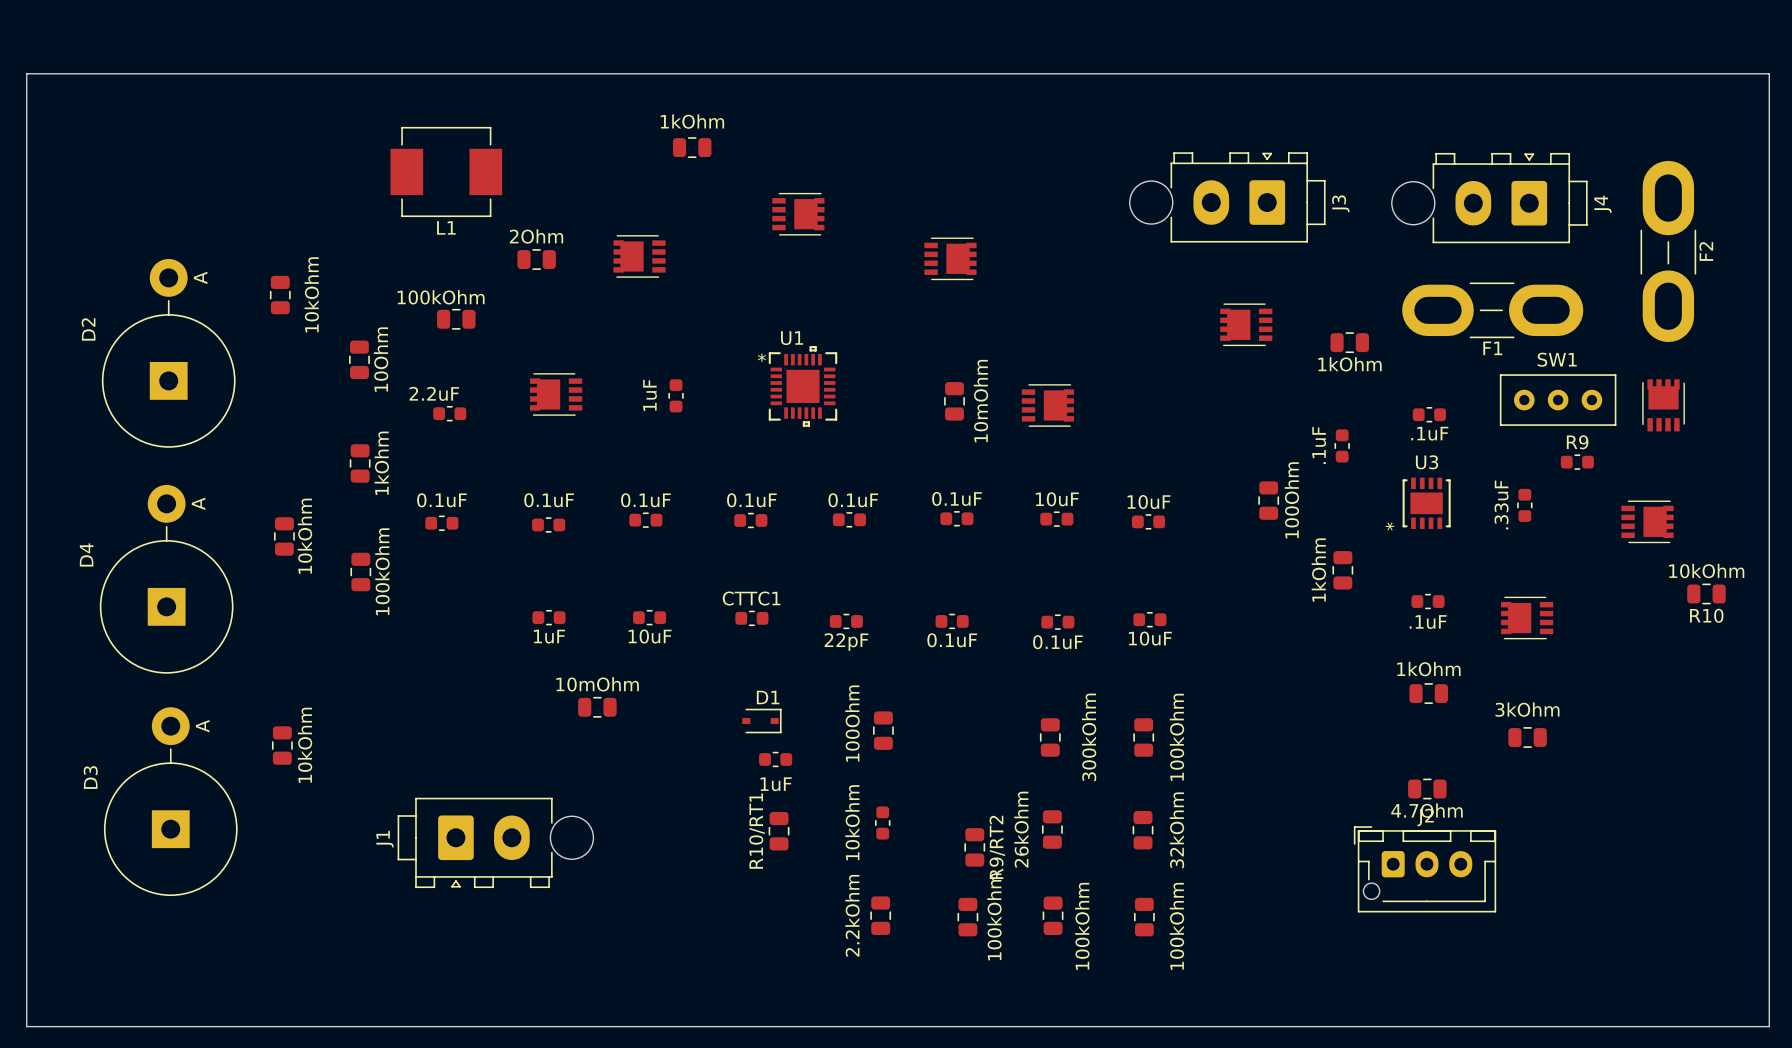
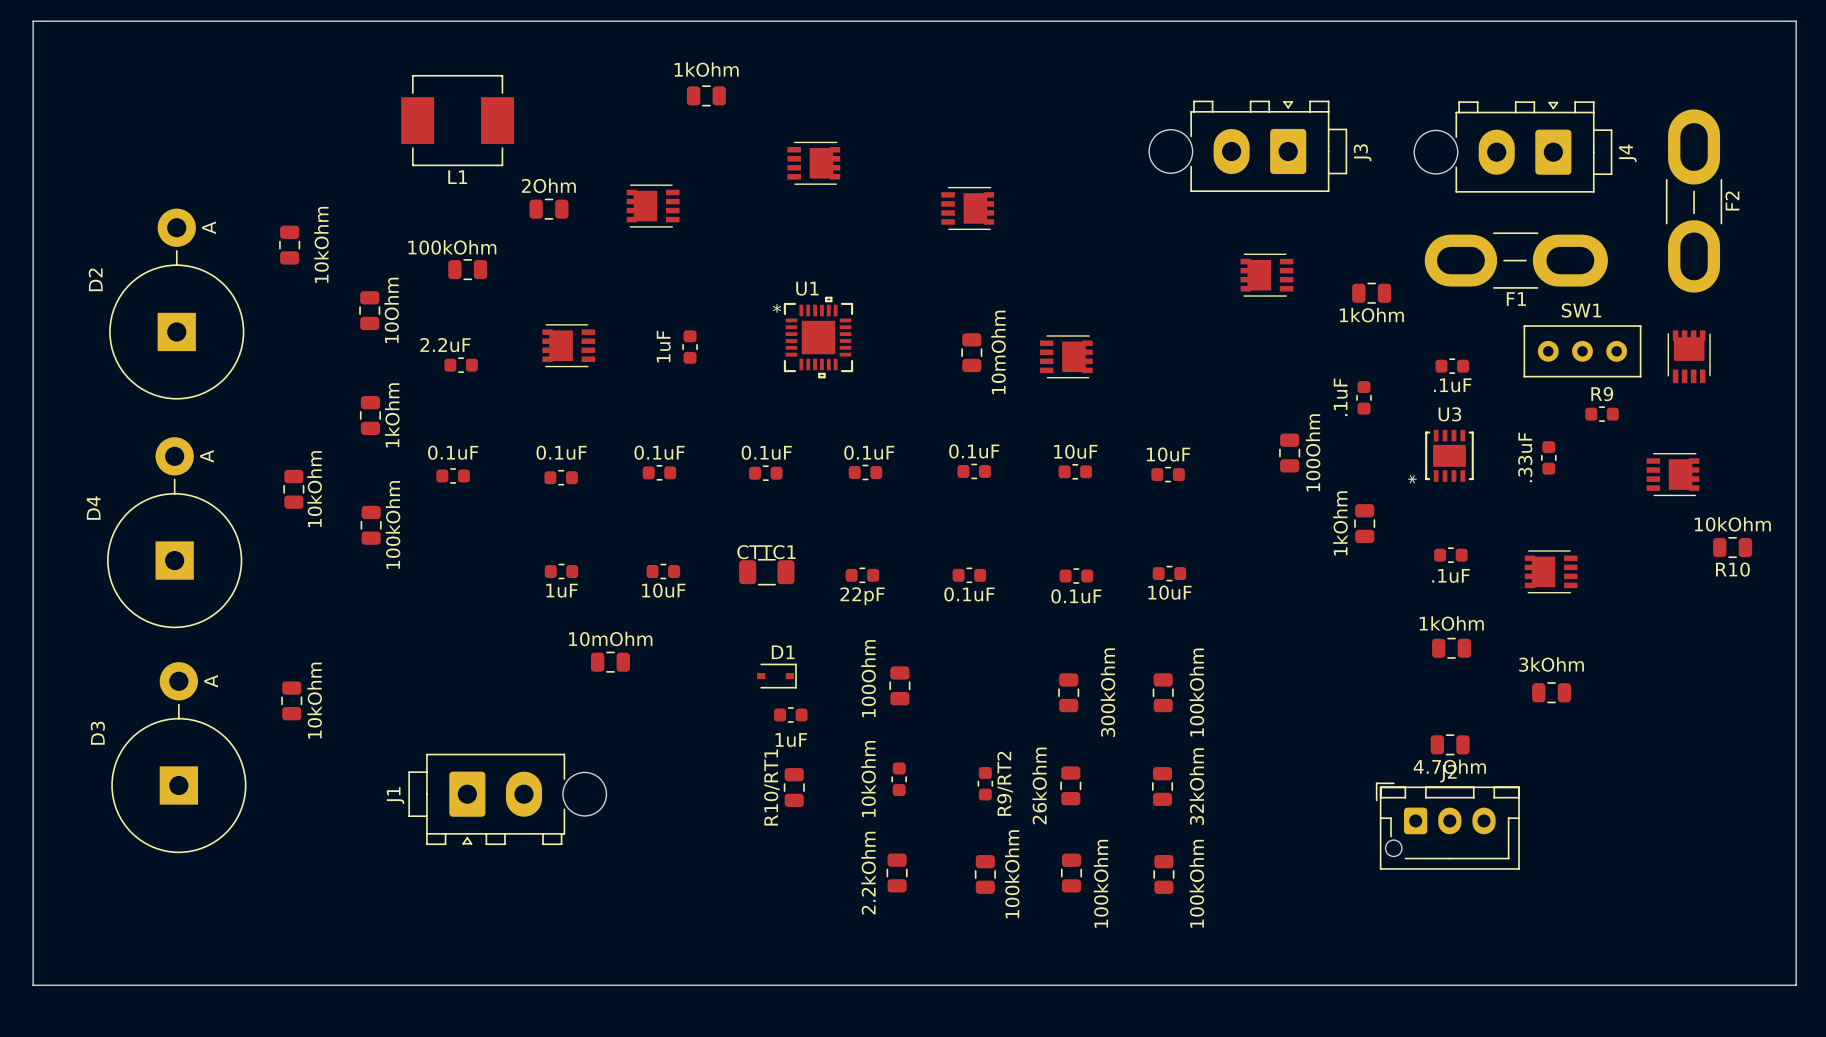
CTTC1 footprint: [735, 610, 769, 627] -> [739, 558, 795, 586]
R9/RT2 footprint: [964, 828, 986, 867] -> [977, 767, 994, 801]

